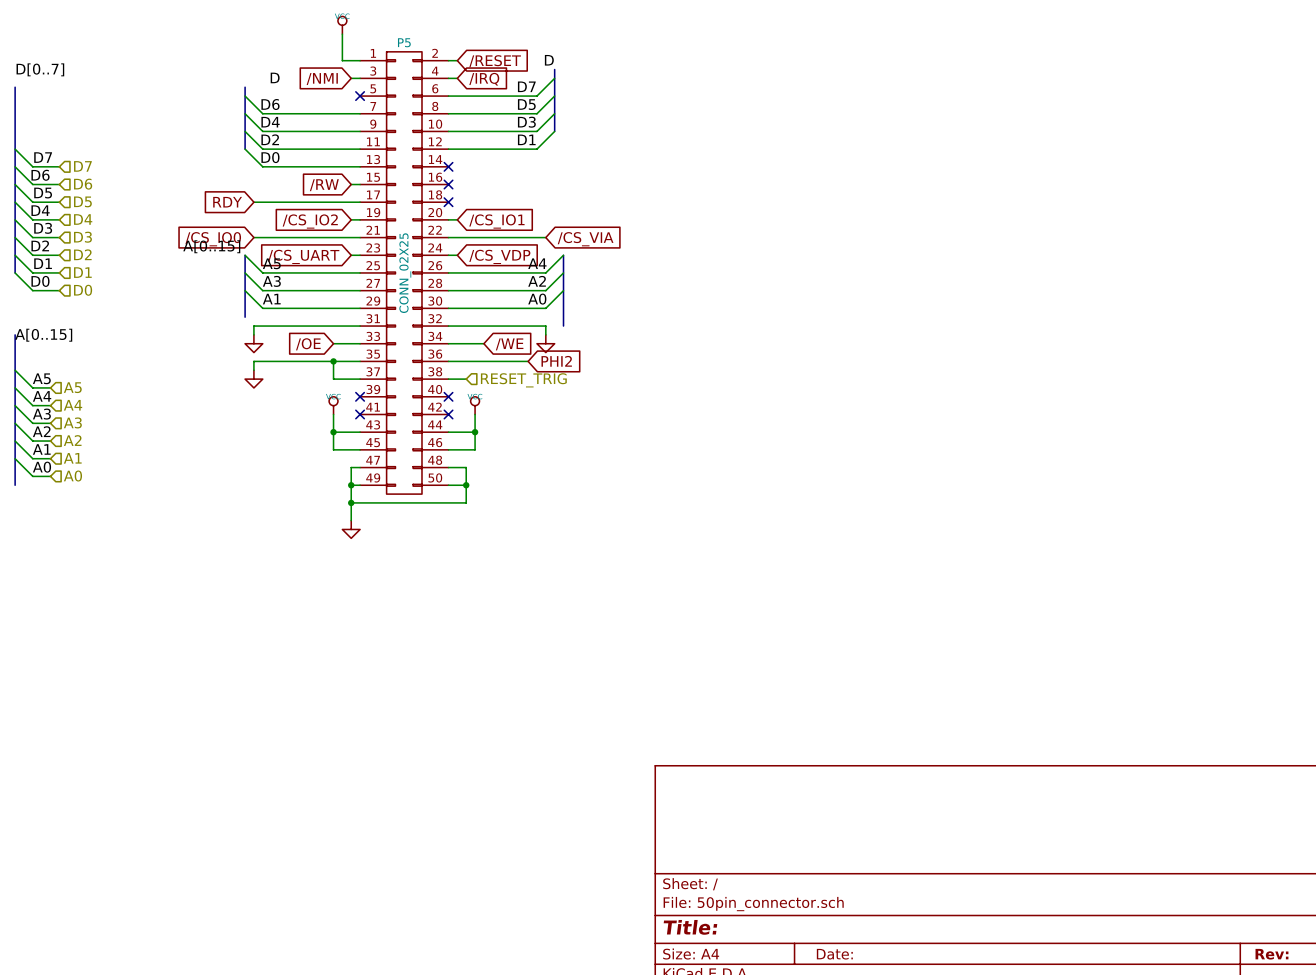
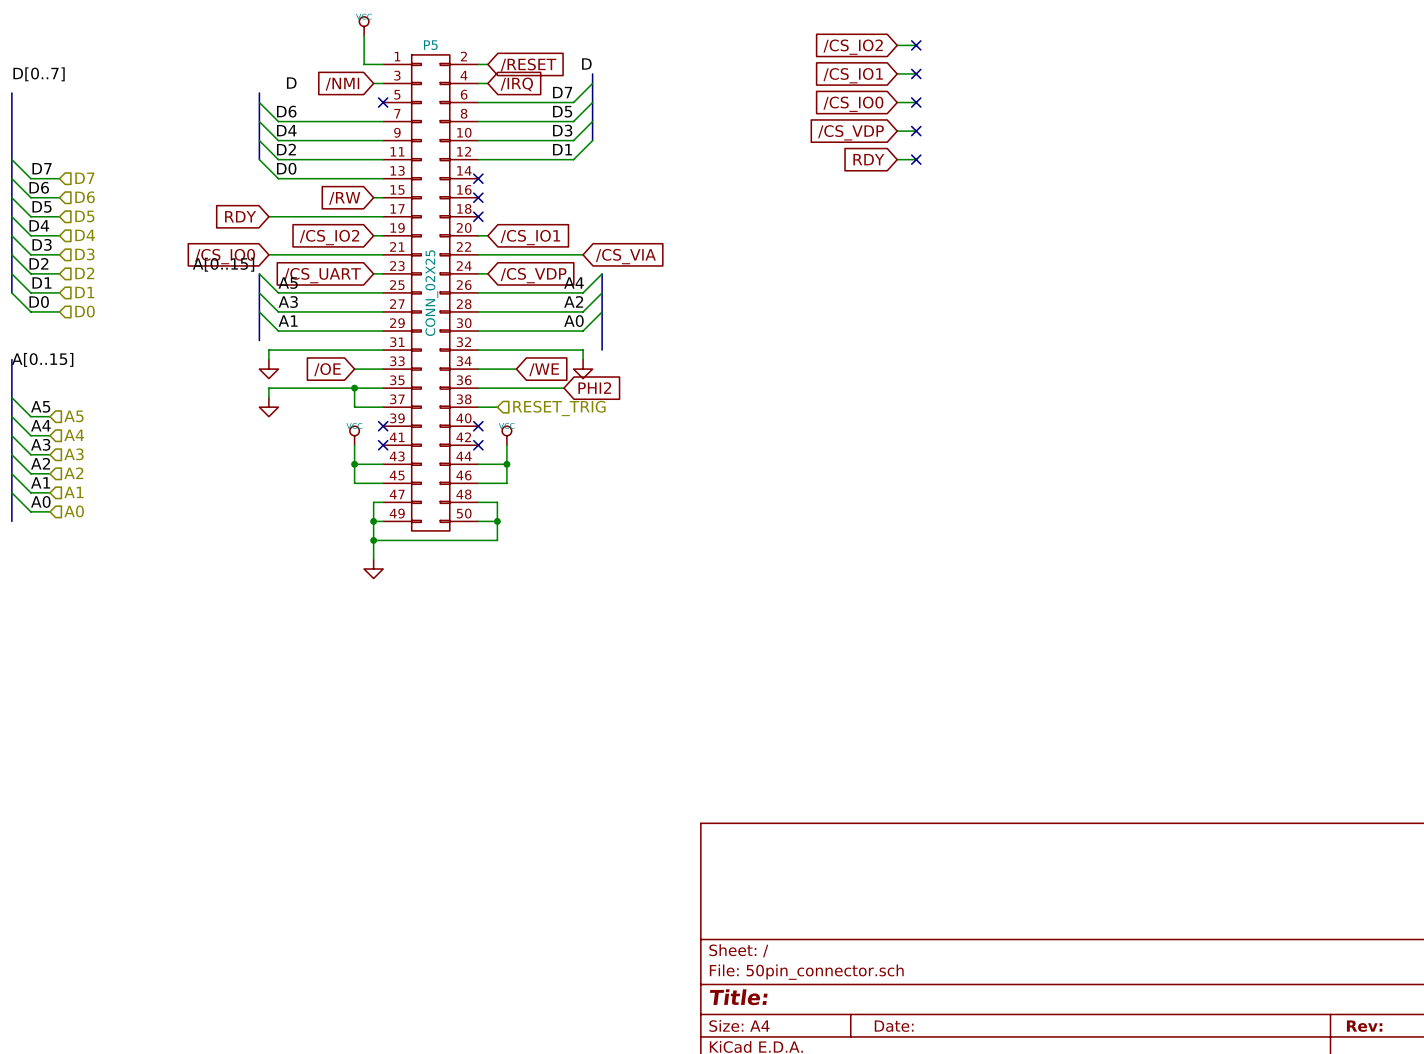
wire: none -> (897, 45) (916, 45)
no-connect mark: none -> (916, 45)
global label: none -> /CS_IO2 (853, 47)
wire: none -> (897, 73) (916, 73)
no-connect mark: none -> (916, 73)
global label: none -> /CS_IO1 (853, 75)
wire: none -> (897, 102) (916, 102)
no-connect mark: none -> (916, 102)
global label: none -> /CS_IO0 (853, 104)
wire: none -> (897, 131) (916, 131)
no-connect mark: none -> (916, 131)
global label: none -> /CS_VDP (850, 132)
global label: none -> RDY (868, 159)
wire: none -> (897, 159) (916, 159)
no-connect mark: none -> (916, 159)

